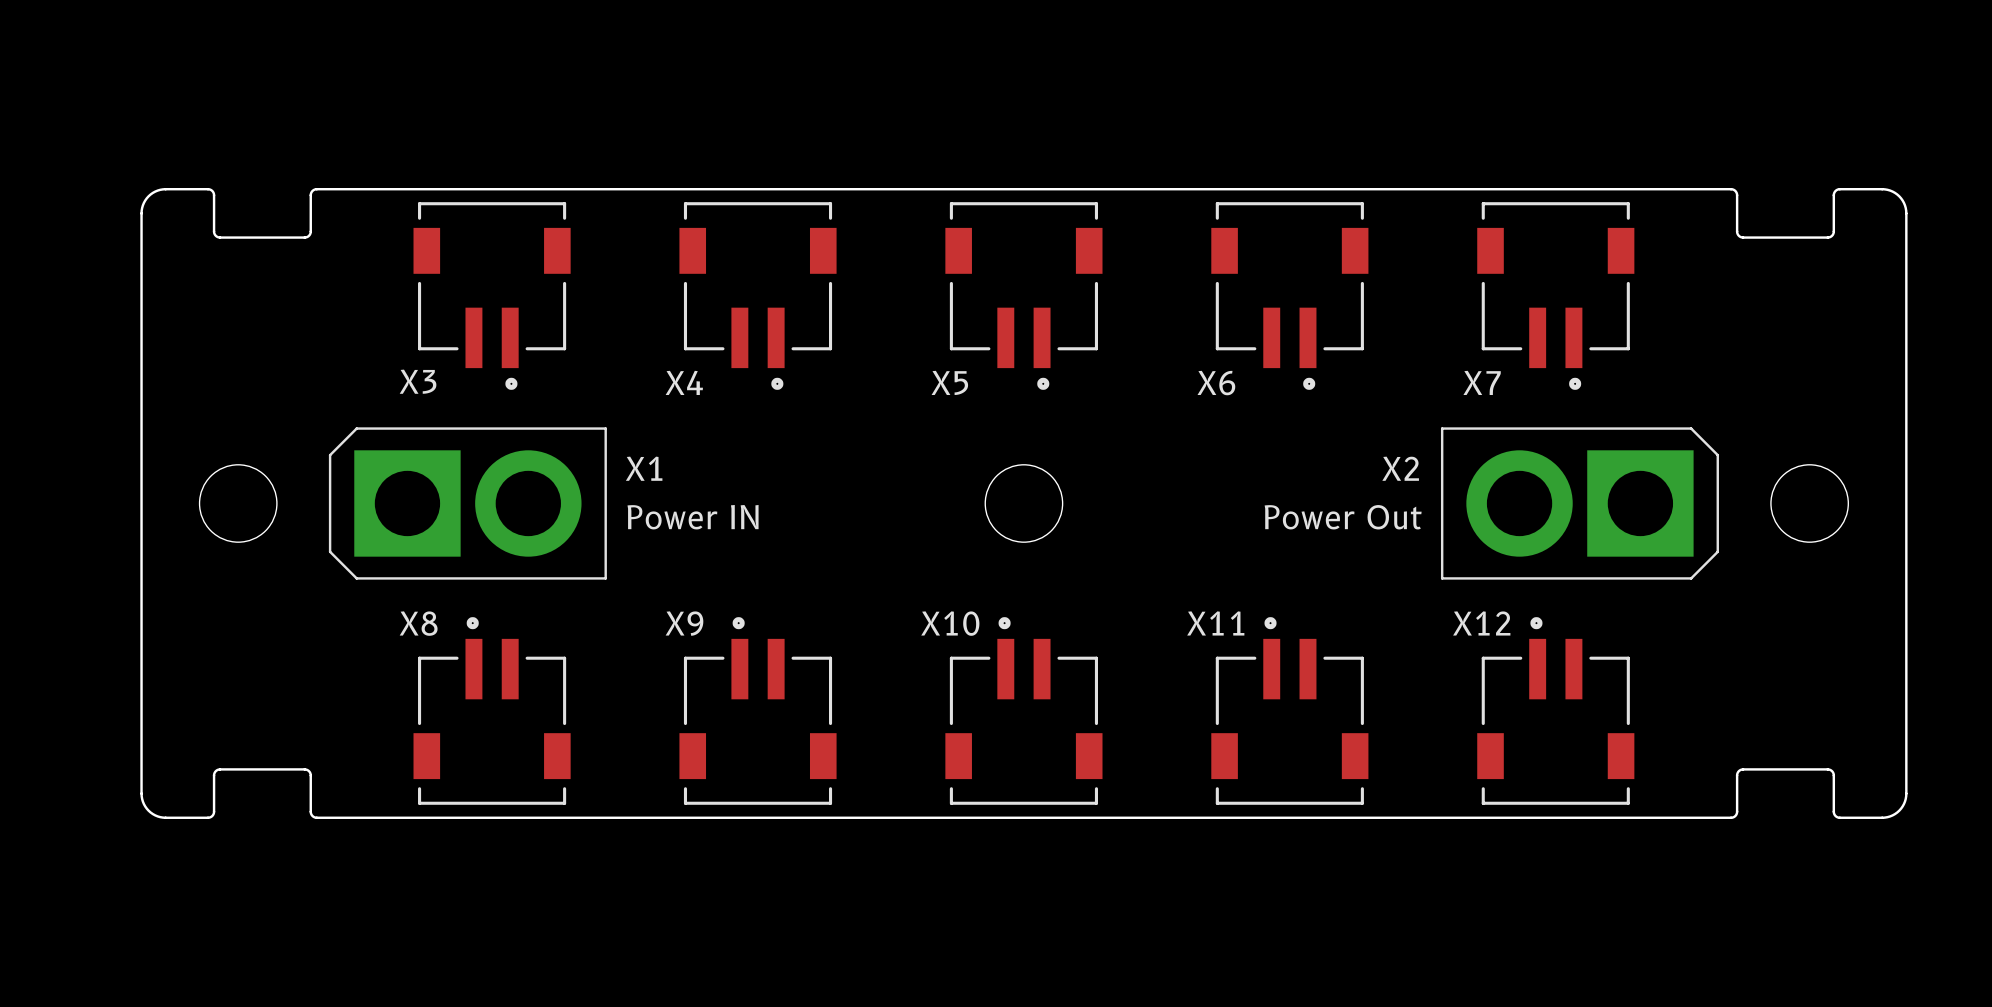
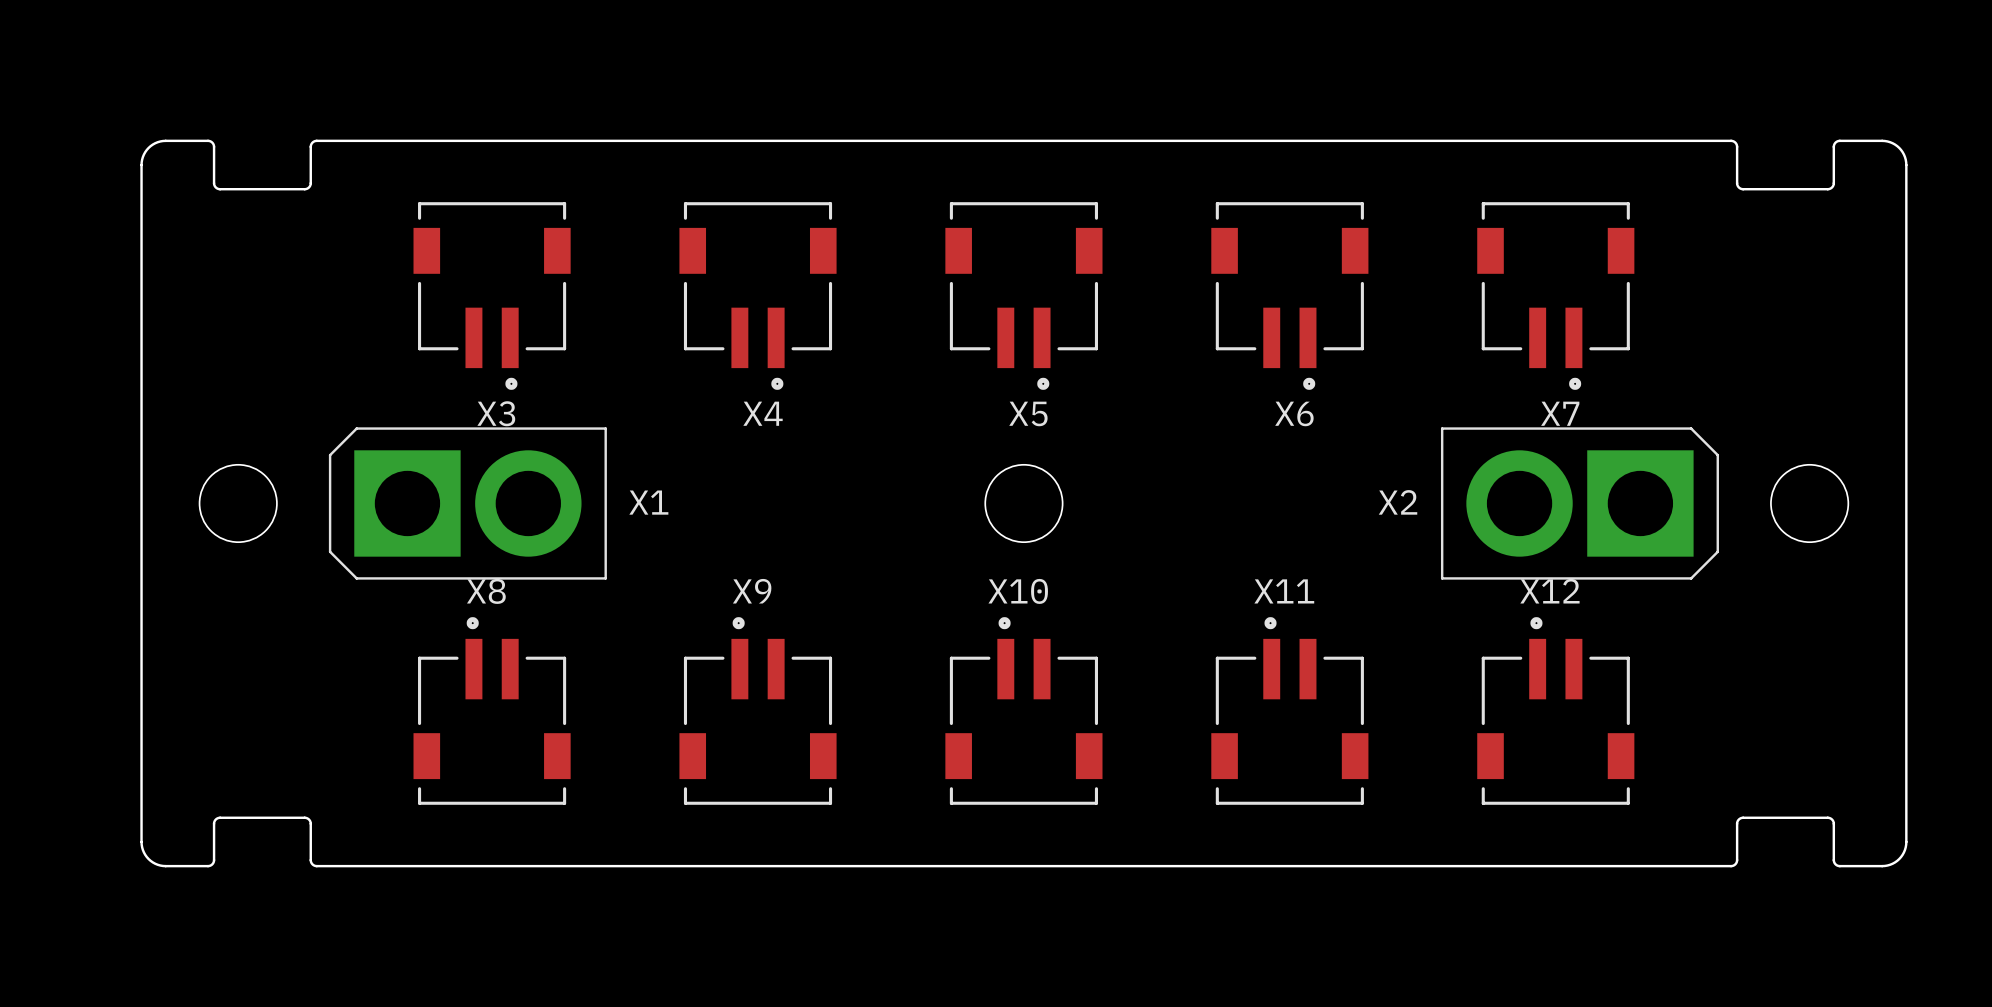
board edge: (141, 213) (143, 202) (148, 196) (155, 191) (165, 189) (211, 190) (214, 194) (214, 232) (220, 237) (307, 236) (310, 232) (310, 193) (316, 189) (1731, 189) (1736, 193) (1737, 232) (1739, 236) (1743, 237) (1830, 236) (1833, 232) (1833, 193) (1839, 189) (1890, 190) (1901, 198) (1906, 213) -> (141, 213) (142, 157) (150, 146) (165, 140) (211, 142) (214, 146) (214, 184) (220, 189) (307, 188) (310, 183) (310, 145) (316, 140) (1731, 140) (1736, 145) (1737, 183) (1740, 188) (1827, 189) (1833, 184) (1833, 146) (1836, 142) (1882, 140) (1897, 146) (1904, 157) (1906, 213)
X3 name position: X3 (418, 381) -> X3 (496, 413)
X4 name position: X4 (684, 382) -> X4 (762, 413)
X5 name position: X5 (949, 382) -> X5 (1028, 413)
X7 name position: X7 (1482, 382) -> X7 (1560, 413)
X6 name position: X6 (1216, 383) -> X6 (1294, 413)
X1 name position: X1 (644, 468) -> X1 (648, 502)
X2 name position: X2 (1400, 468) -> X2 (1398, 502)
X1 value: Power IN (693, 517) -> none
X2 value: Power Out (1343, 517) -> none
X8 name position: X8 (418, 623) -> X8 (486, 591)
X9 name position: X9 (684, 623) -> X9 (752, 591)
X10 name position: X10 (950, 623) -> X10 (1018, 591)
X11 name position: X11 (1215, 623) -> X11 (1284, 591)
X12 name position: X12 (1481, 623) -> X12 (1549, 591)
board edge: (141, 793) (143, 804) (148, 810) (155, 815) (165, 817) (211, 816) (214, 812) (214, 774) (220, 769) (307, 770) (310, 774) (310, 813) (316, 817) (1731, 817) (1736, 813) (1737, 774) (1739, 770) (1743, 769) (1830, 770) (1833, 774) (1833, 813) (1839, 817) (1890, 816) (1901, 808) (1906, 793) -> (141, 793) (142, 849) (150, 860) (165, 866) (211, 864) (214, 860) (214, 822) (220, 817) (307, 818) (310, 823) (310, 861) (316, 866) (1731, 866) (1736, 861) (1737, 823) (1740, 818) (1827, 817) (1833, 822) (1833, 860) (1836, 864) (1882, 866) (1895, 862) (1904, 849) (1906, 793)

